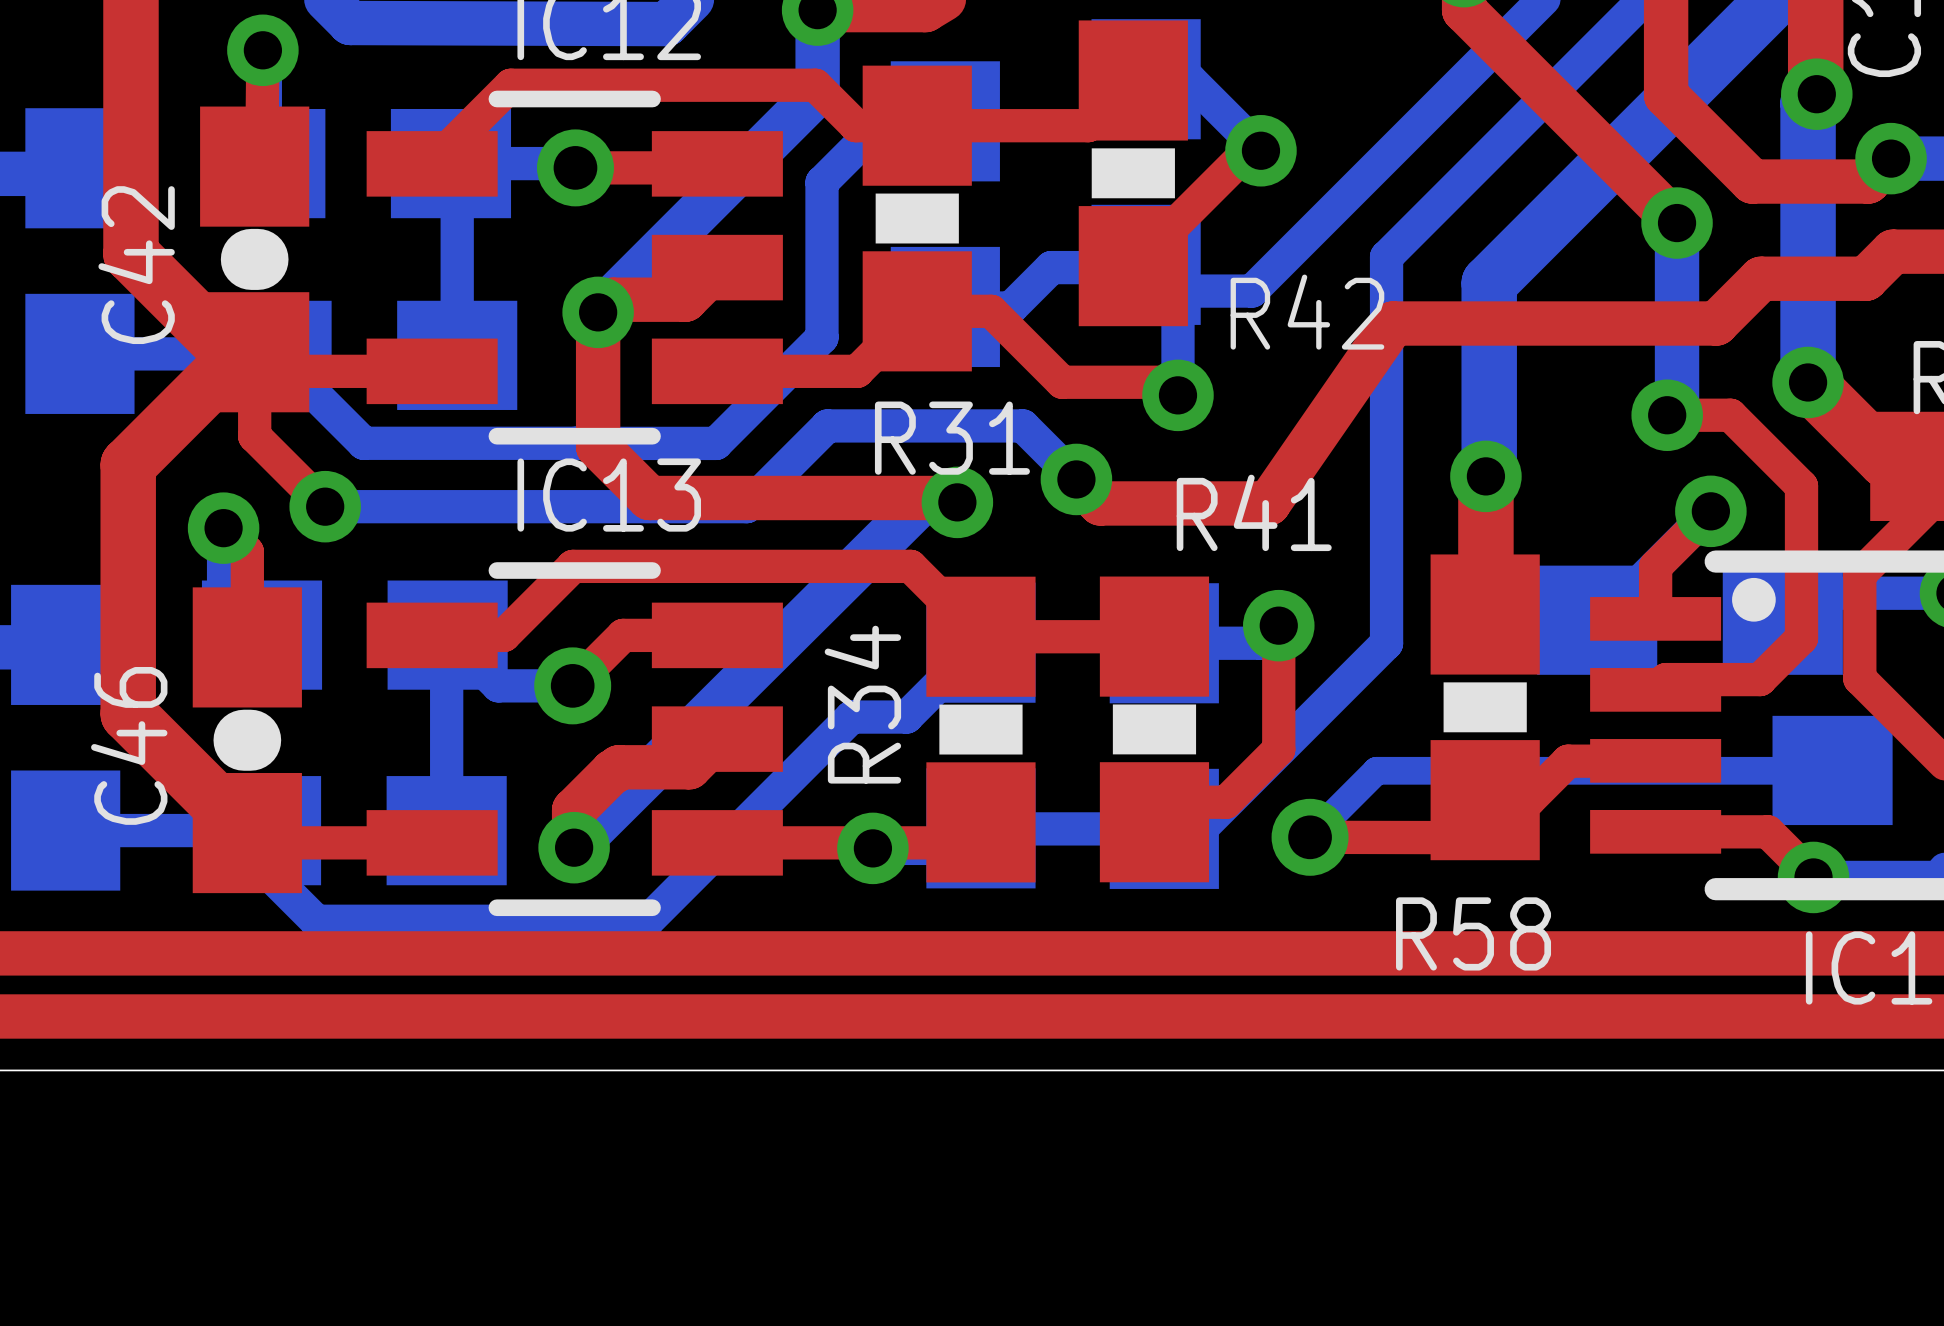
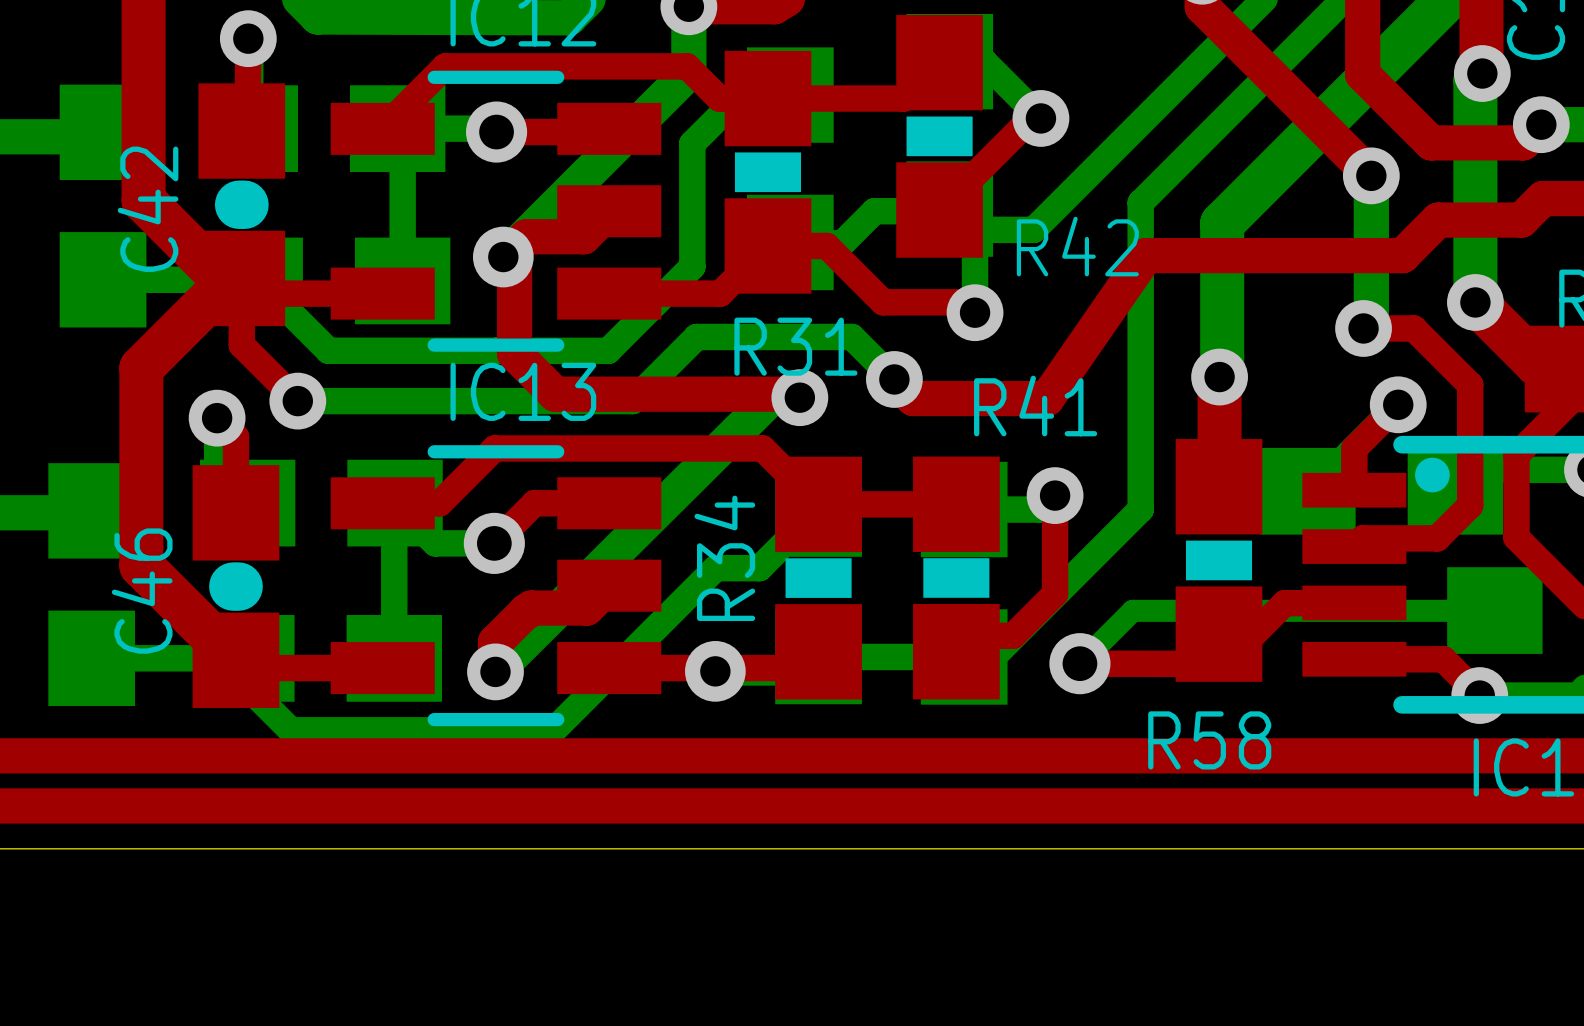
via position: (598, 312) -> (503, 257)
via position: (872, 848) -> (715, 671)

